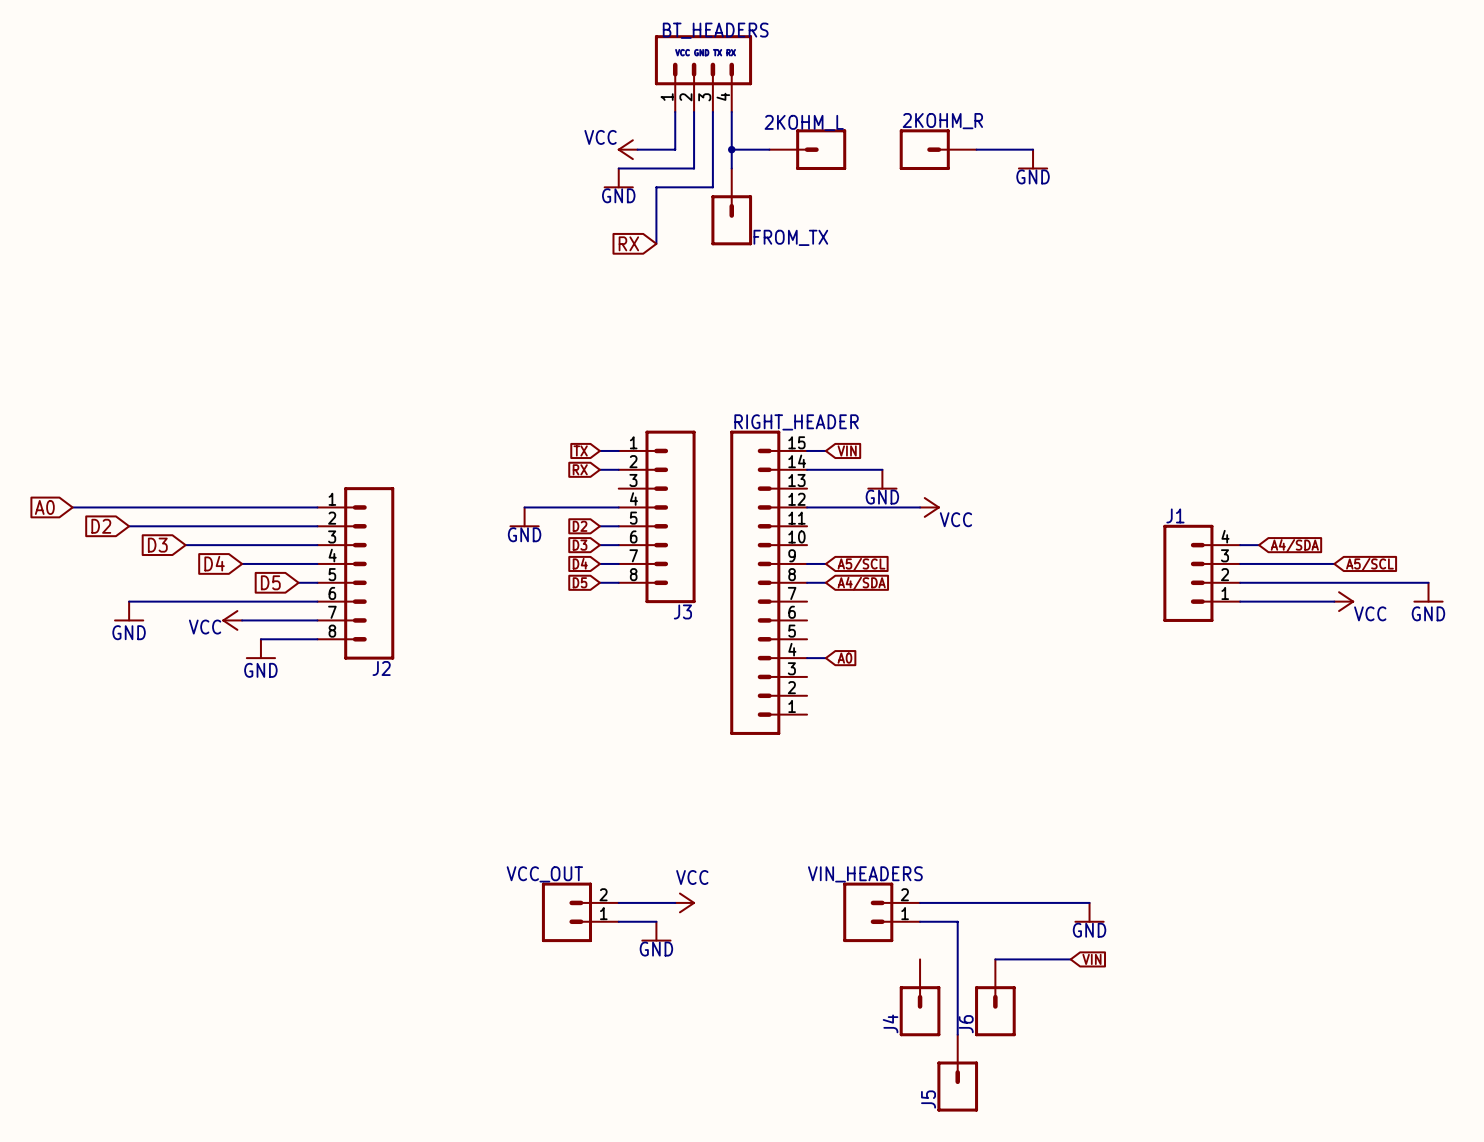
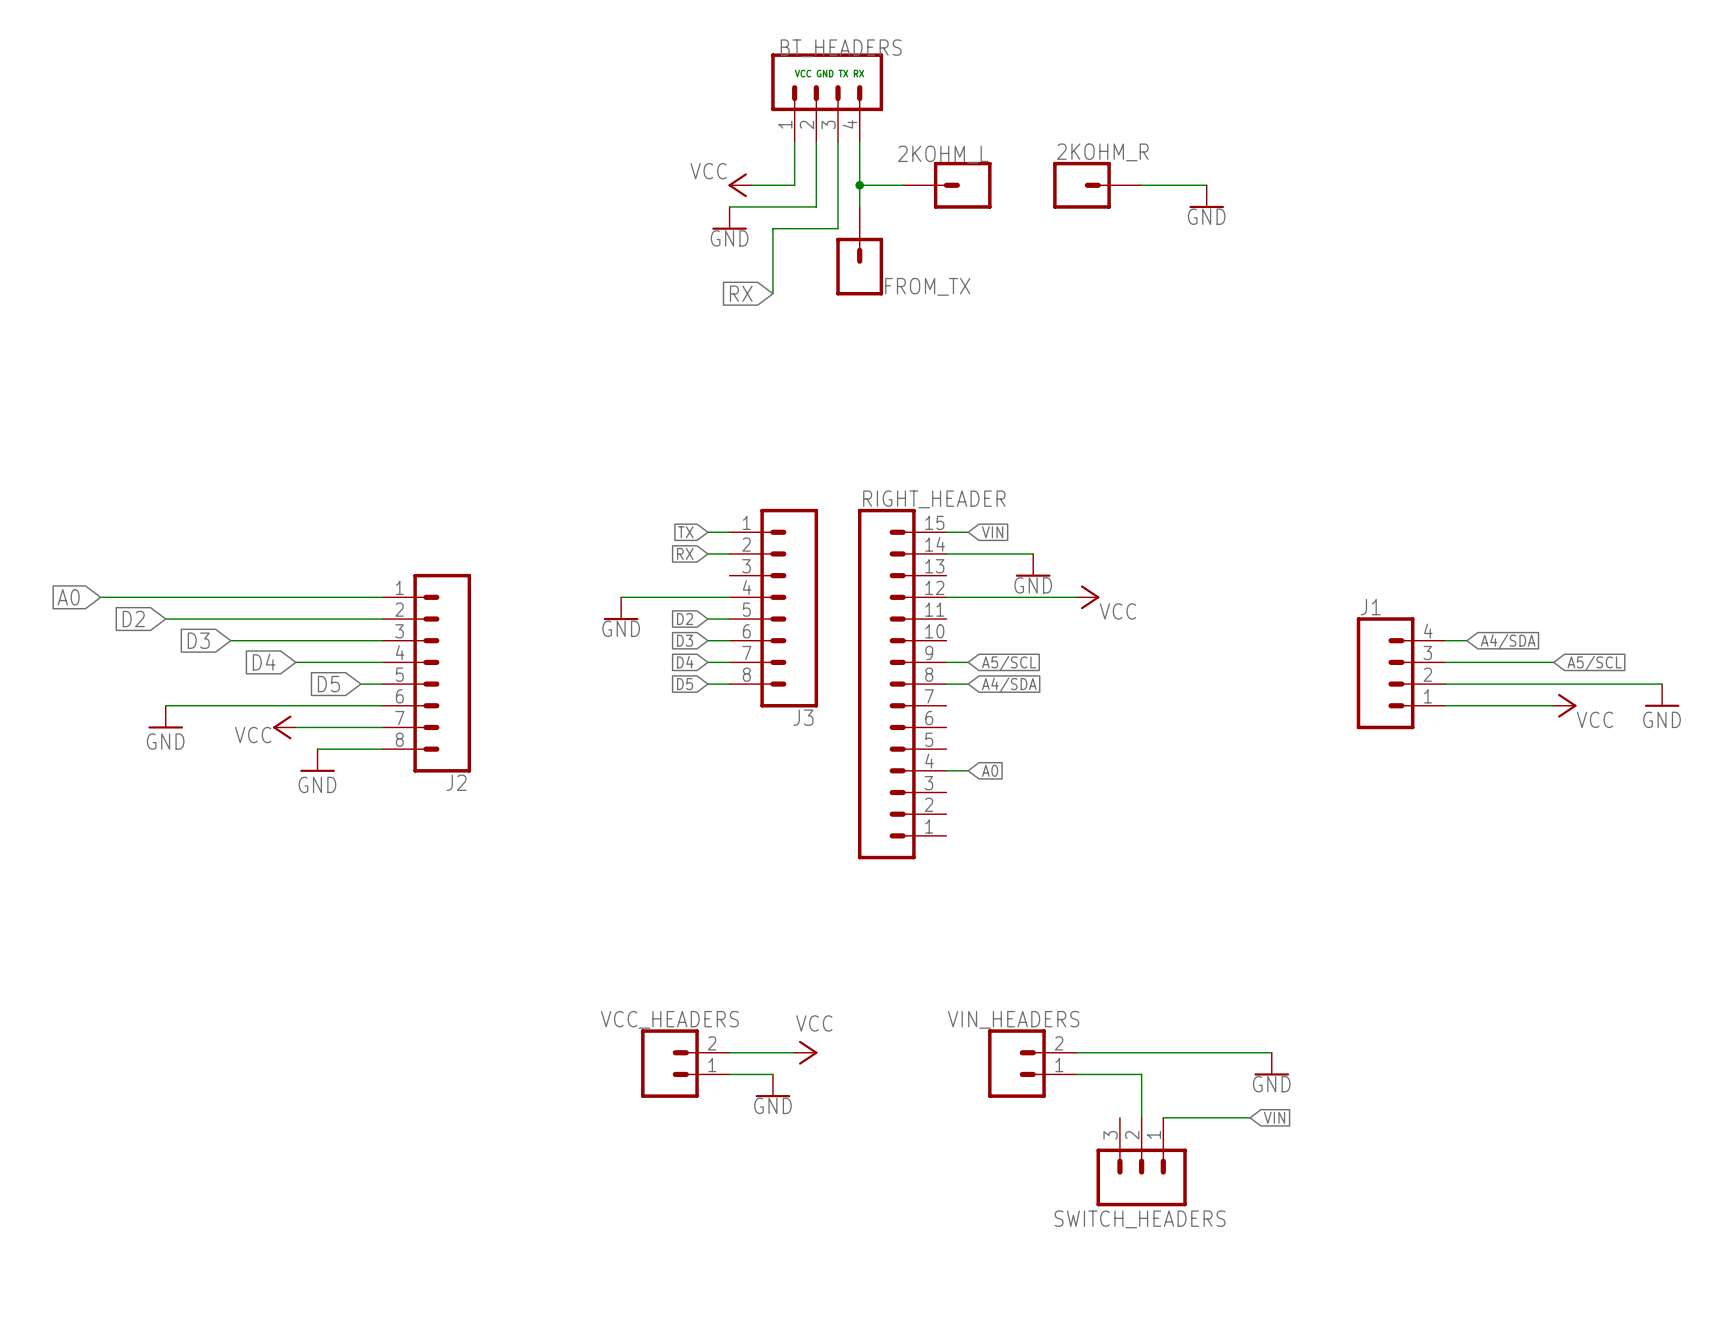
VCC_OUT name: VCC_OUT (544, 874) -> VCC_HEADERS (669, 1019)
wire: (957, 921) (957, 1034) -> (1119, 1074) (1141, 1074) (1141, 1117)
J4: (920, 997) -> none
SWITCH_HEADERS: none -> (1141, 1162)
J6: (995, 997) -> none
J5: (957, 1073) -> none

